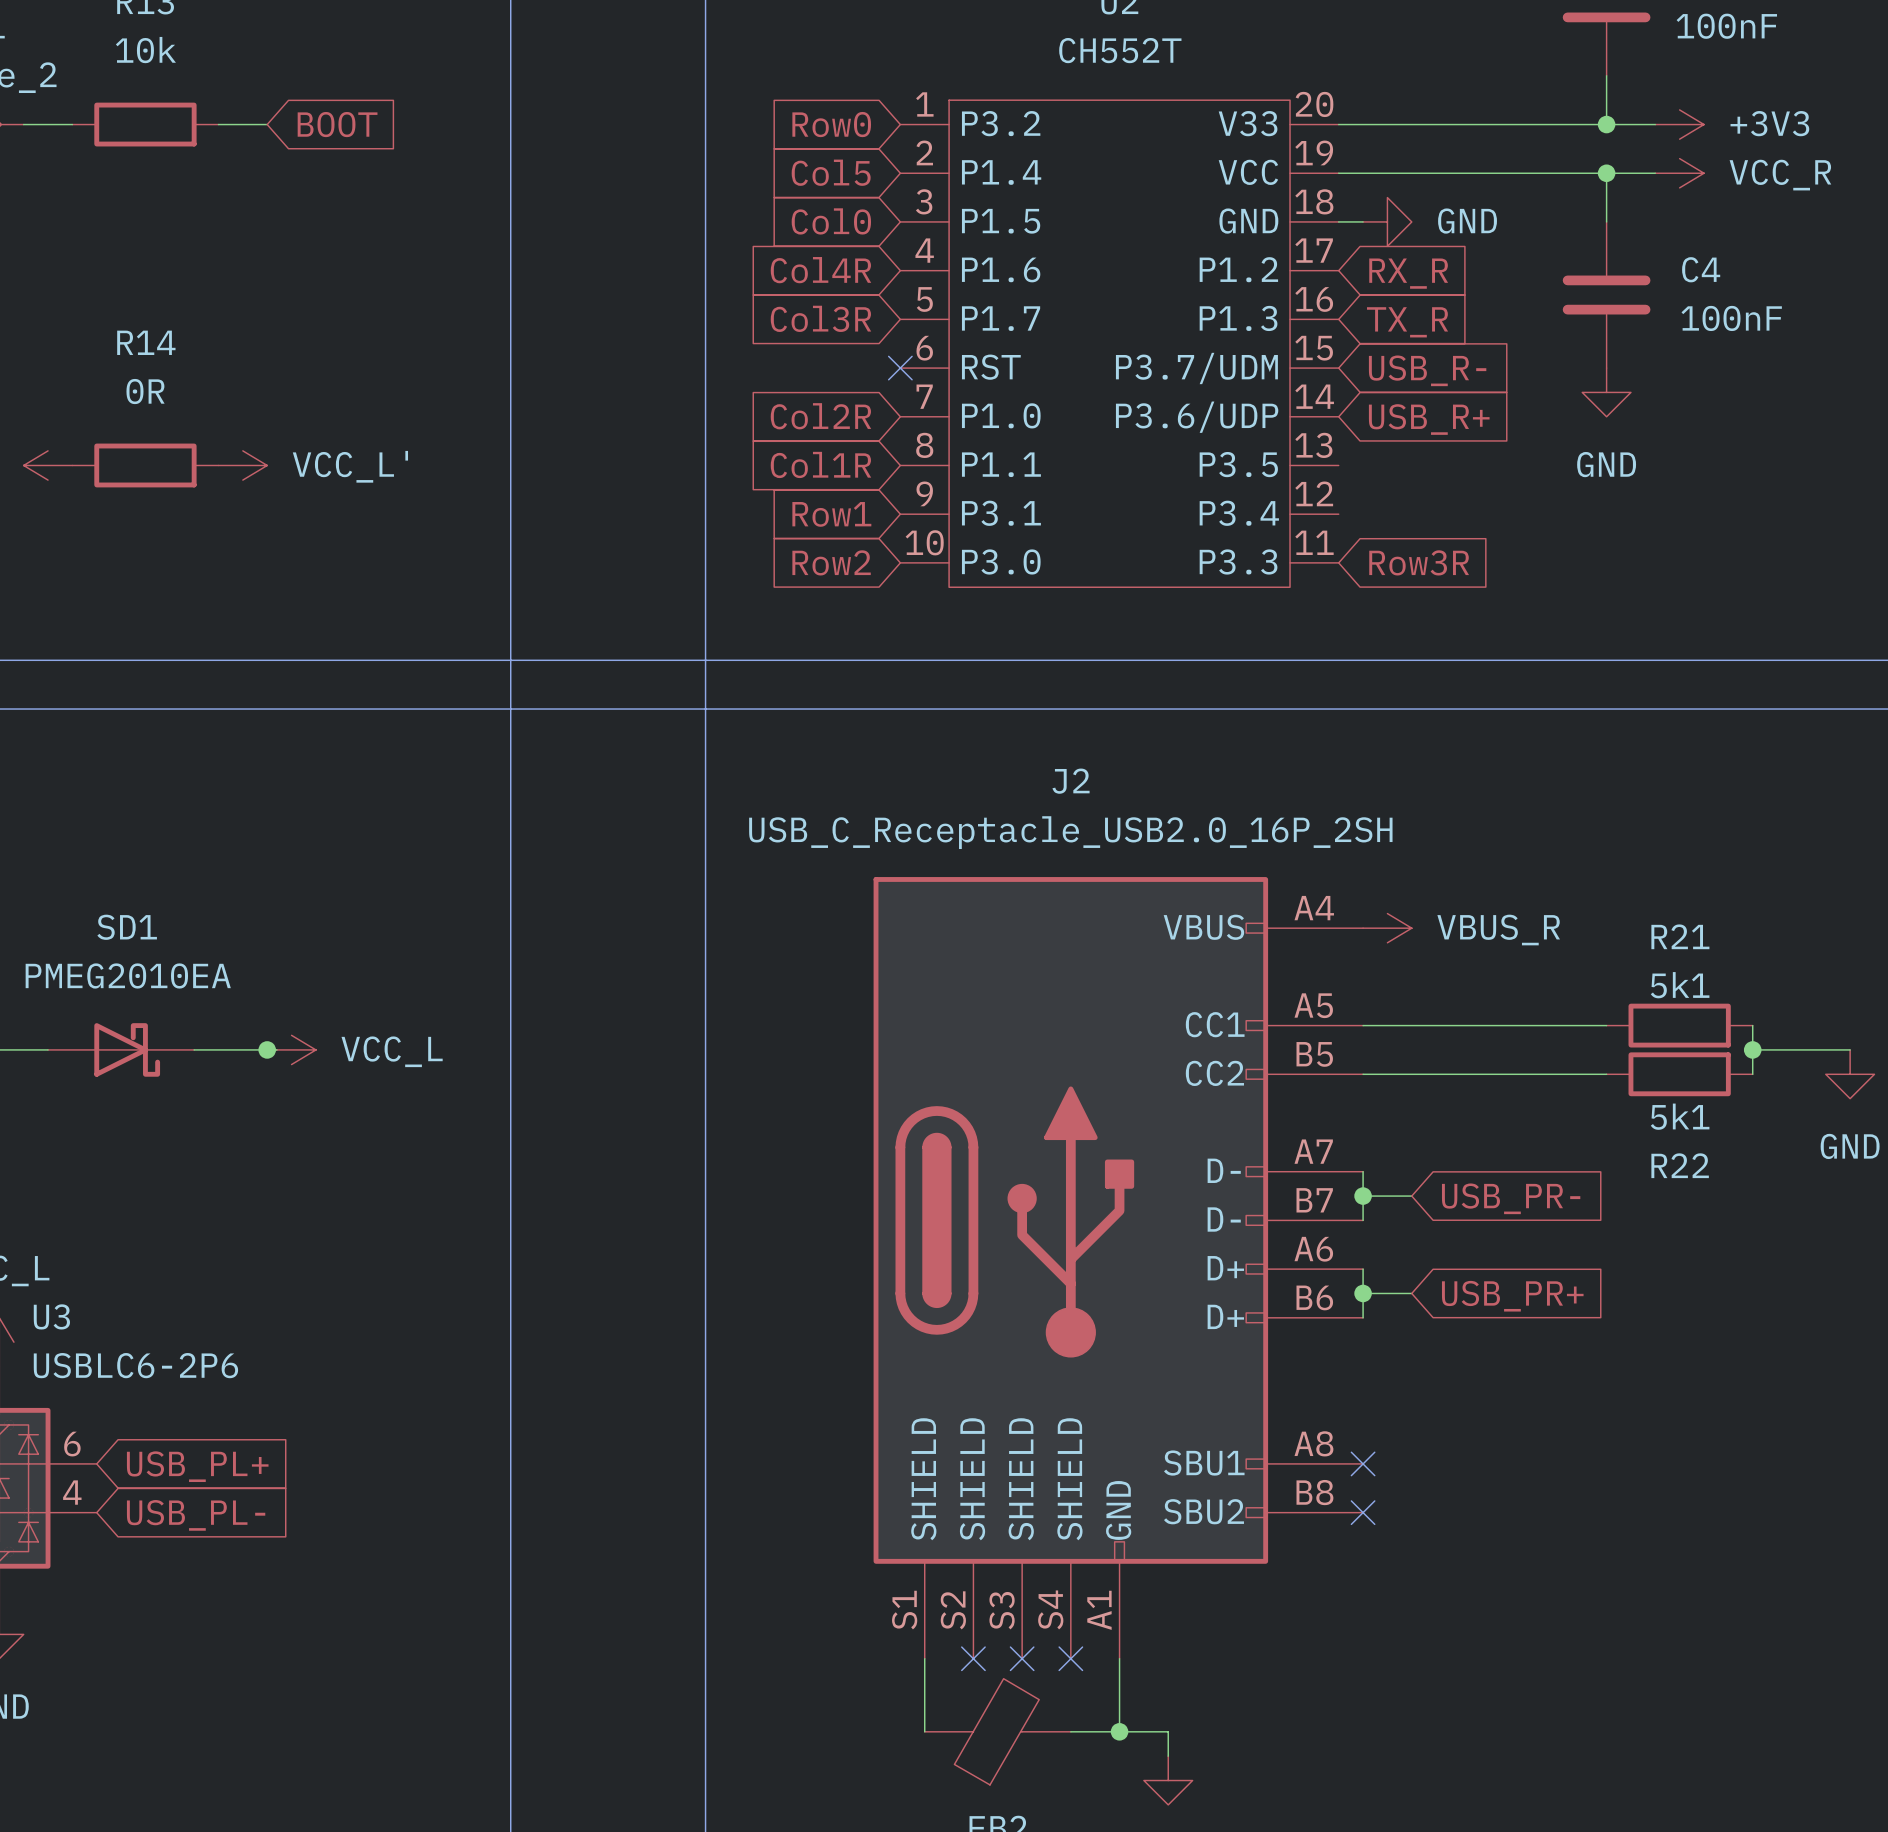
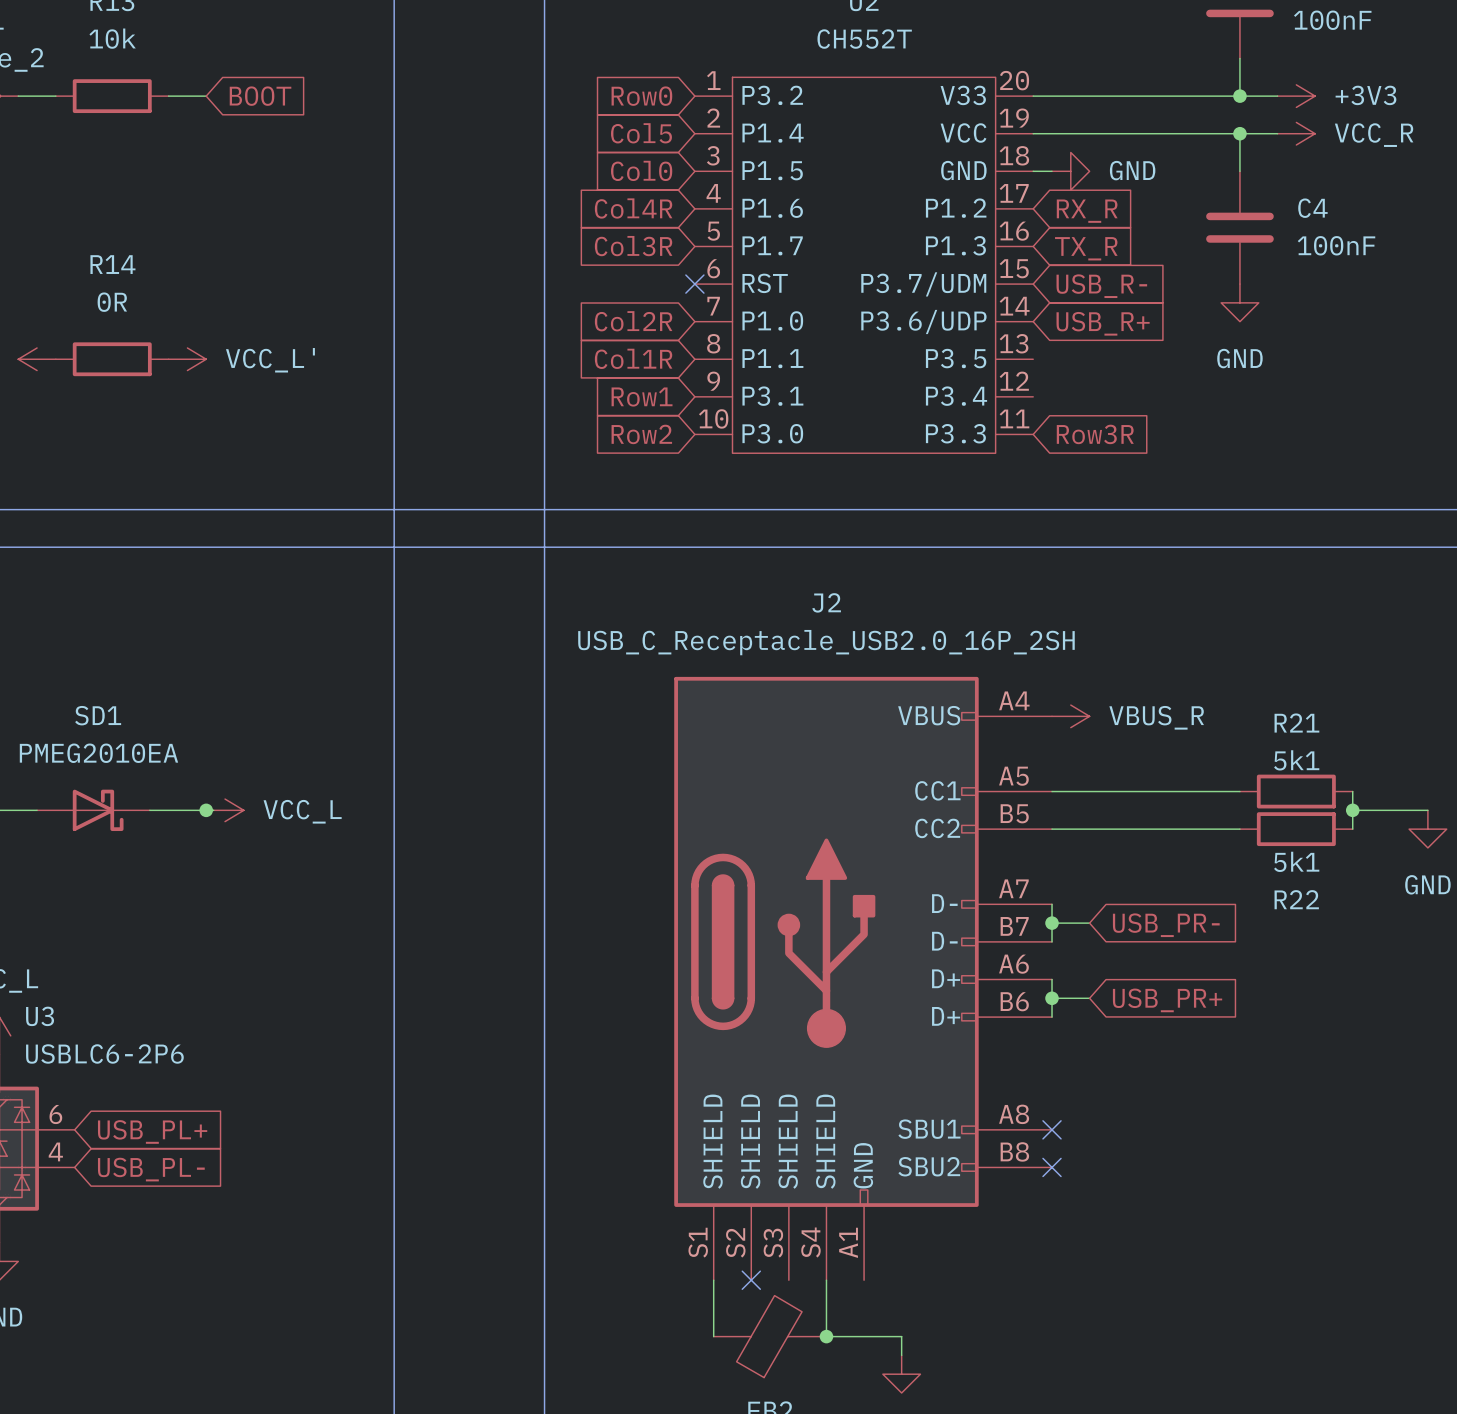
no-connect mark: (1022, 1658) -> none
no-connect mark: (1070, 1658) -> none
wire: (1119, 1658) (1119, 1731) -> (826, 1280) (826, 1336)
junction position: (1119, 1731) -> (826, 1336)

